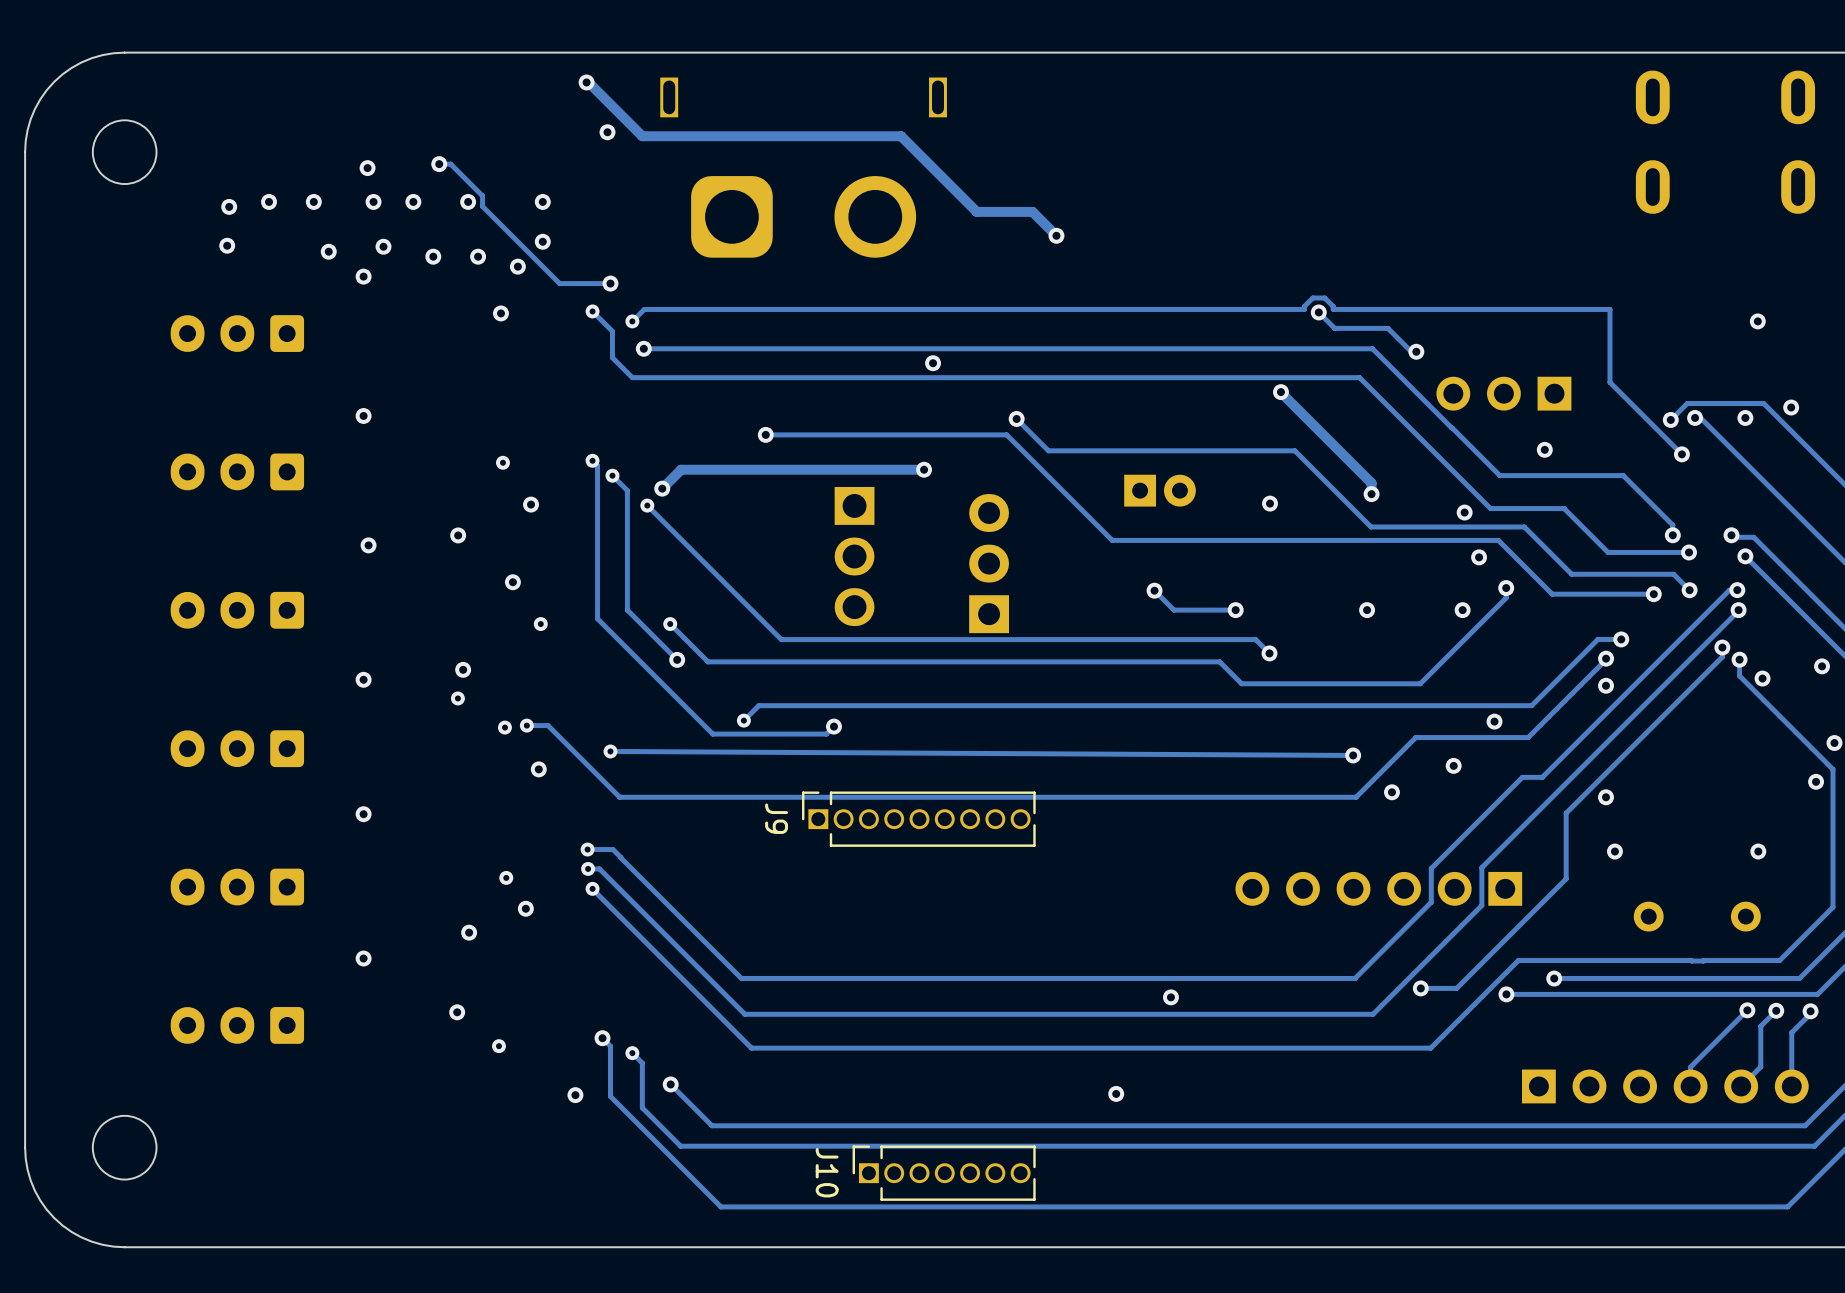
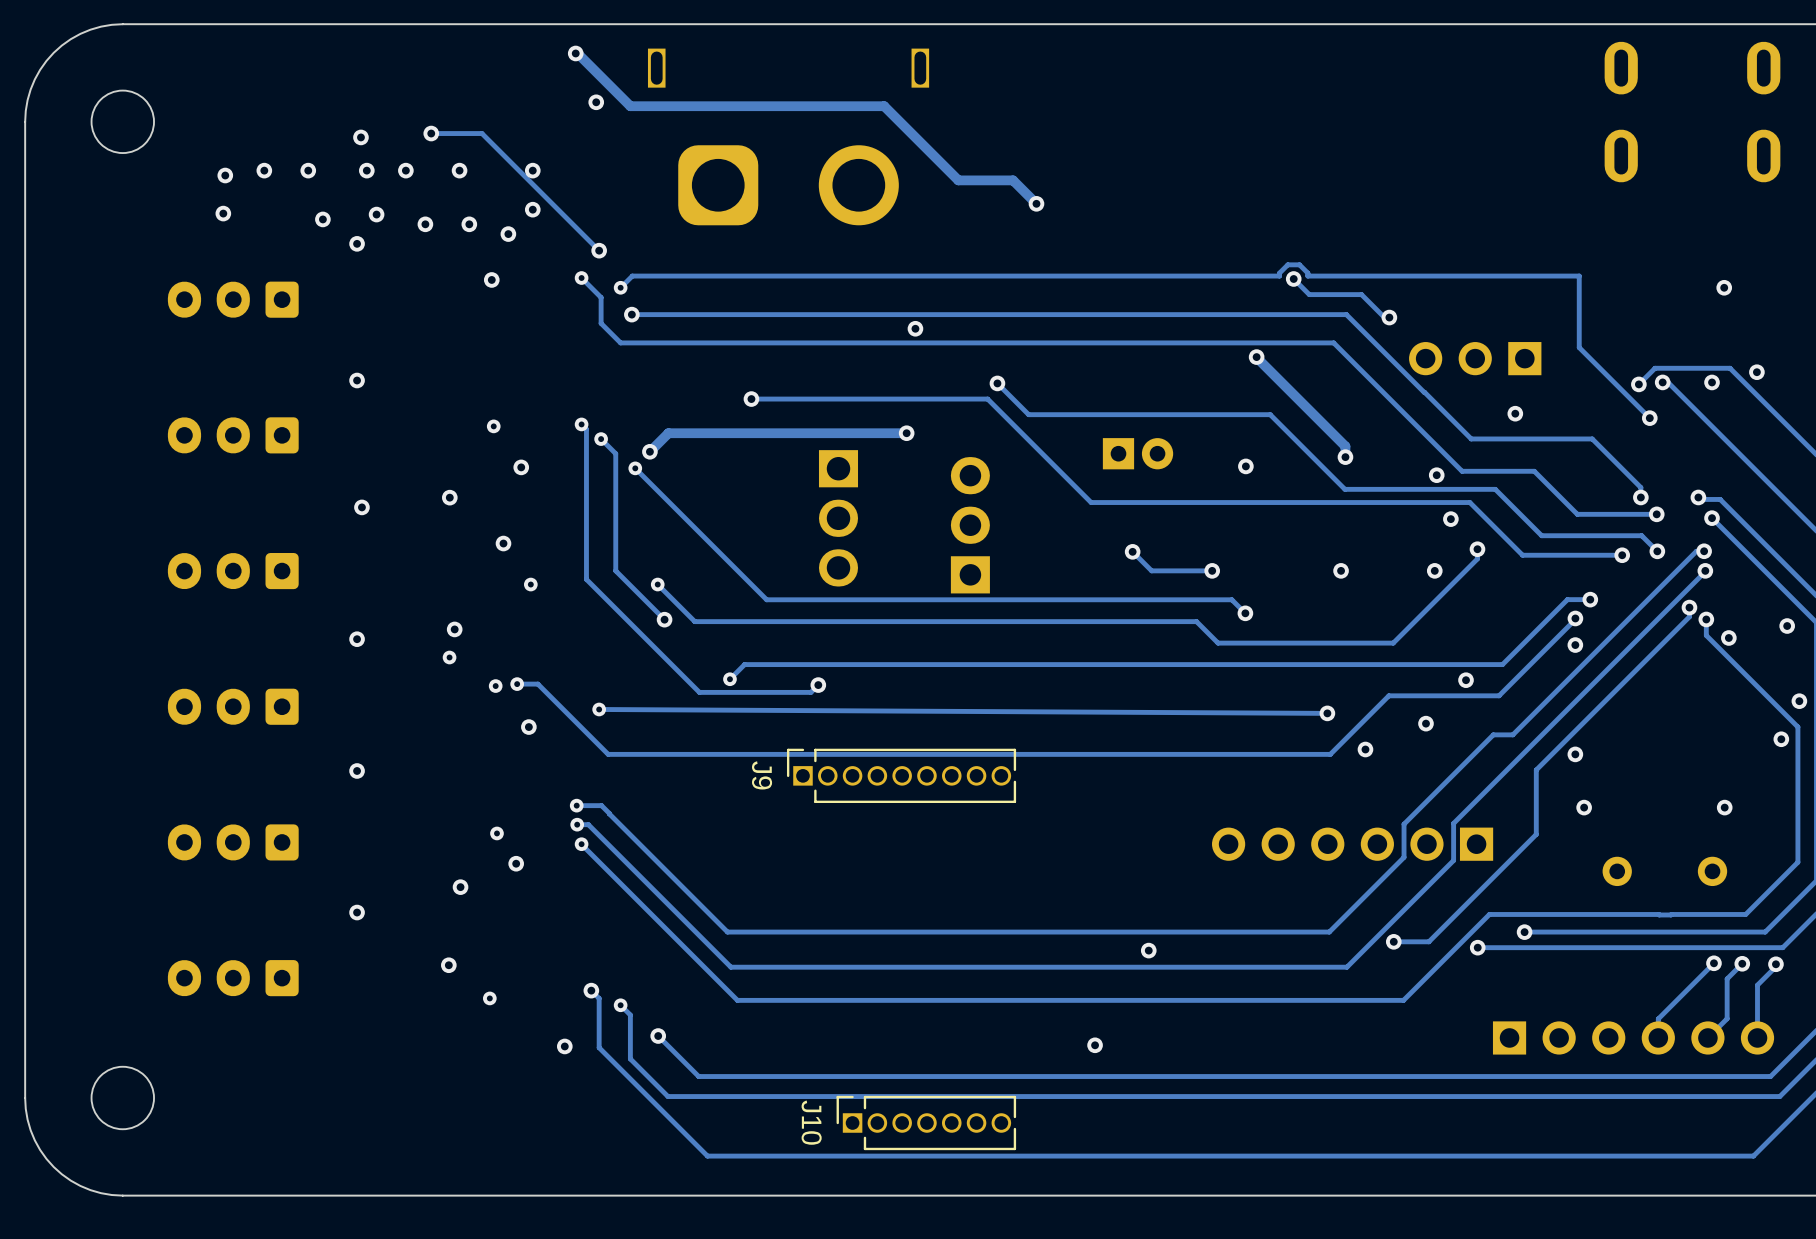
track: (450, 164) (482, 195) (482, 206) (559, 283) (610, 283) -> (442, 133) (482, 133) (599, 250)

